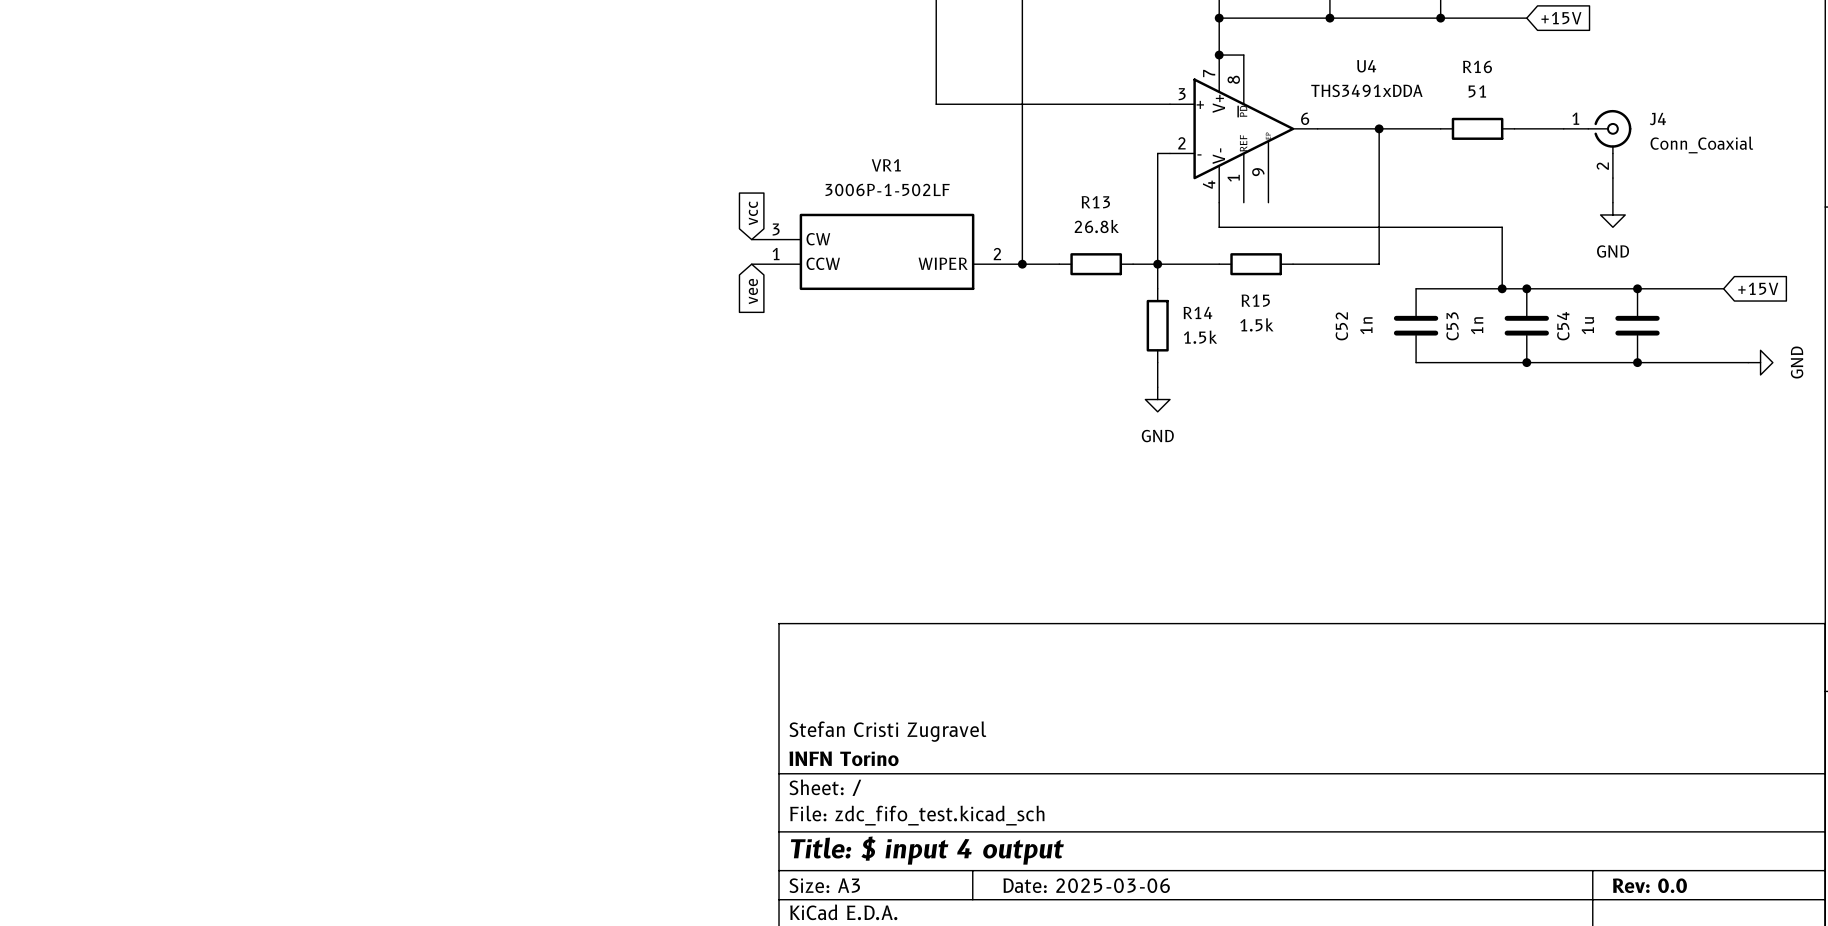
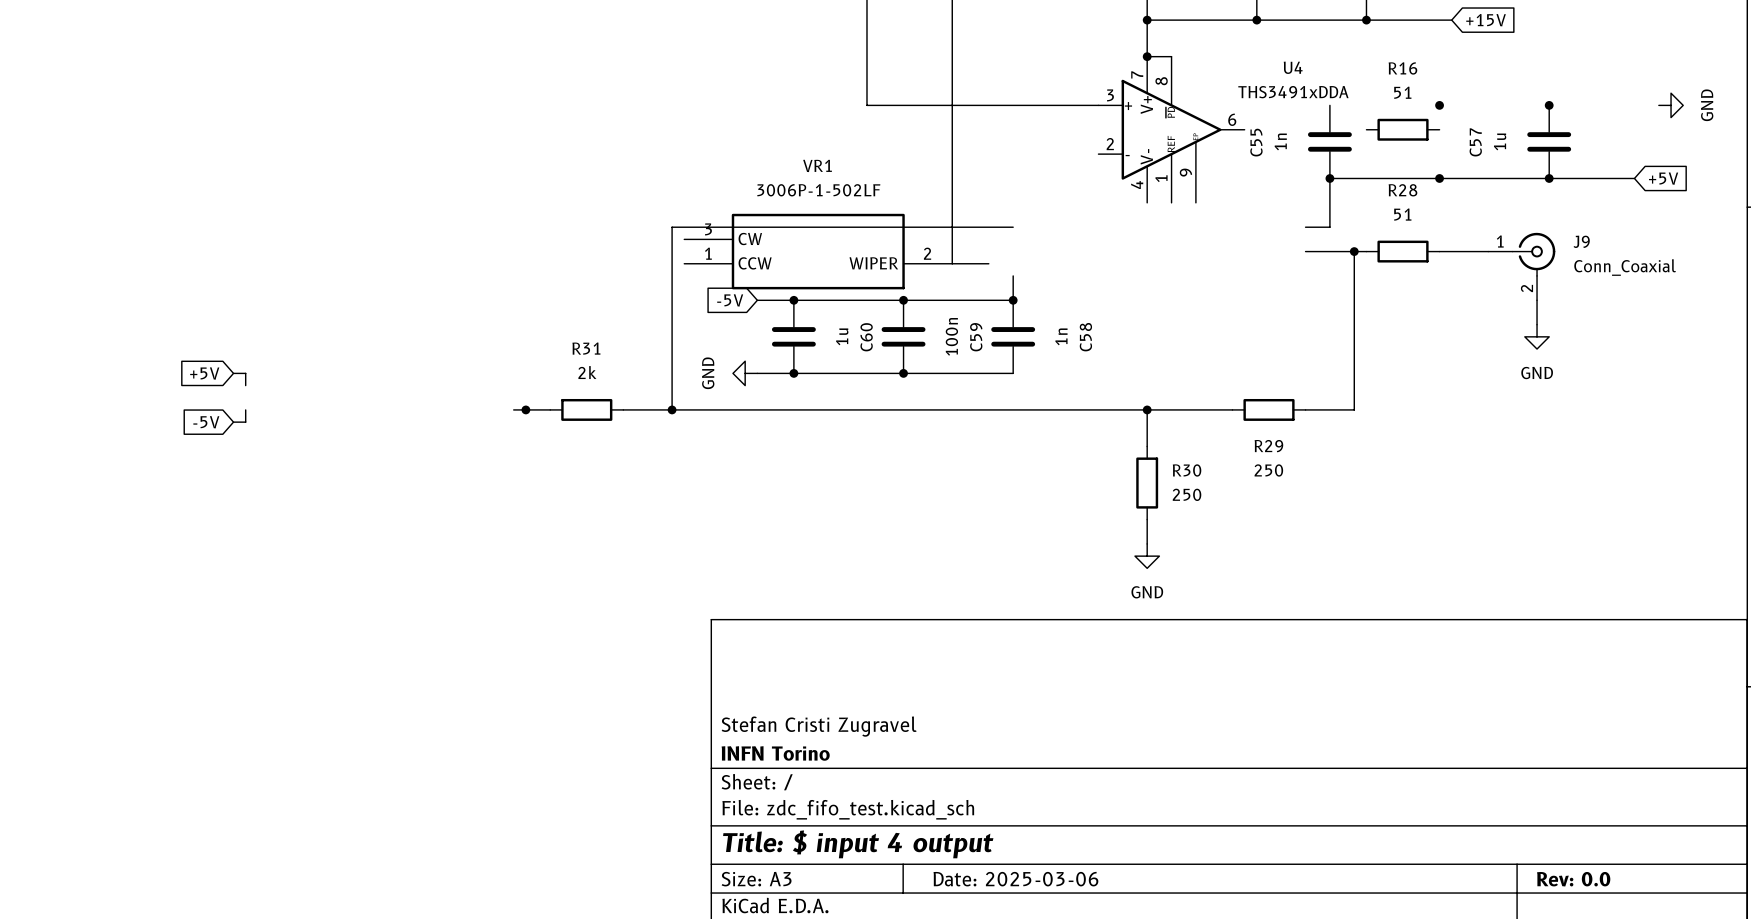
junction: none -> (1439, 105)
junction: none -> (1549, 105)
power symbol: none -> GND (1671, 105)
wire: (1317, 128) (1440, 128) -> none
wire: (1379, 128) (1379, 264) (1293, 264) -> none
junction position: (1379, 128) -> (1329, 178)
wire: (1514, 128) (1563, 128) -> (1439, 251) (1488, 251)
C55: none -> 1n (1329, 141)
C57: none -> 1u (1549, 141)
J4: Conn_Coaxial (1597, 144) -> none
wire: (1170, 153) (1157, 153) (1157, 288) -> none
junction: none -> (1439, 178)
wire: (1612, 178) (1612, 202) -> (1537, 300) (1537, 324)
junction: none -> (1549, 178)
global label: none -> +5V (1663, 178)
wire: (1219, 202) (1219, 227) (1379, 227) -> none
global label: vcc (753, 213) -> none
power symbol: GND (1612, 214) -> none
wire: none -> (1013, 227) (672, 227) (672, 409)
wire: (1403, 227) (1502, 227) (1502, 288) -> (1329, 227) (1329, 178) (1634, 178)
wire: none -> (1305, 251) (1366, 251)
wire: none -> (1354, 251) (1354, 409) (1305, 409)
junction: none -> (1354, 251)
R28: none -> 51 (1403, 251)
junction: (1022, 264) -> none
R13: 26.8k (1096, 264) -> none
wire: (1133, 264) (1219, 264) -> none
junction: (1157, 264) -> none
R15: 1.5k (1256, 264) -> none
J9: none -> Conn_Coaxial (1521, 266)
wire: none -> (1013, 275) (1013, 300) (757, 300)
wire: (1416, 288) (1723, 288) -> none
junction: (1502, 288) -> none
junction: (1526, 288) -> none
junction: (1637, 288) -> none
global label: +15V (1758, 288) -> none
global label: vee (753, 291) -> none
global label: none -> -5V (730, 300)
junction: none -> (793, 300)
junction: none -> (903, 300)
junction: none -> (1013, 300)
R14: 1.5k (1157, 325) -> none
C52: 1n (1416, 325) -> none
C53: 1n (1526, 325) -> none
C54: 1u (1637, 325) -> none
C60: none -> 1u (793, 336)
C59: none -> 100n (903, 336)
C58: none -> 1n (1013, 336)
power symbol: none -> GND (1537, 336)
wire: (1157, 362) (1157, 387) -> (1147, 519) (1147, 543)
wire: (1416, 362) (1748, 362) -> none
junction: (1526, 362) -> none
junction: (1637, 362) -> none
power symbol: GND (1760, 362) -> none
wire: none -> (233, 373) (245, 373) (245, 385)
power symbol: none -> GND (745, 373)
wire: none -> (757, 373) (1013, 373)
junction: none -> (793, 373)
junction: none -> (903, 373)
global label: none -> +5V (204, 373)
power symbol position: GND (1157, 399) -> GND (1147, 556)
wire: none -> (245, 409) (245, 422) (233, 422)
wire: none -> (513, 409) (550, 409)
junction: none -> (525, 409)
R31: none -> 2k (586, 409)
wire: none -> (623, 409) (1232, 409)
junction: none -> (672, 409)
wire: none -> (1147, 409) (1147, 446)
junction: none -> (1147, 409)
R29: none -> 250 (1269, 409)
global label: none -> -5V (206, 422)
R30: none -> 250 (1147, 483)

